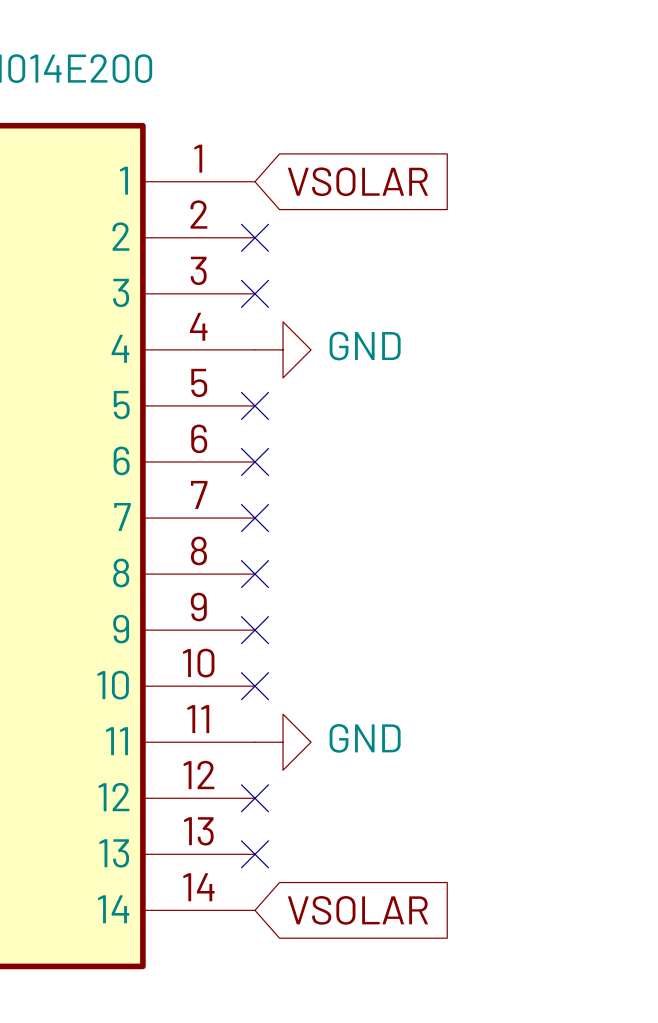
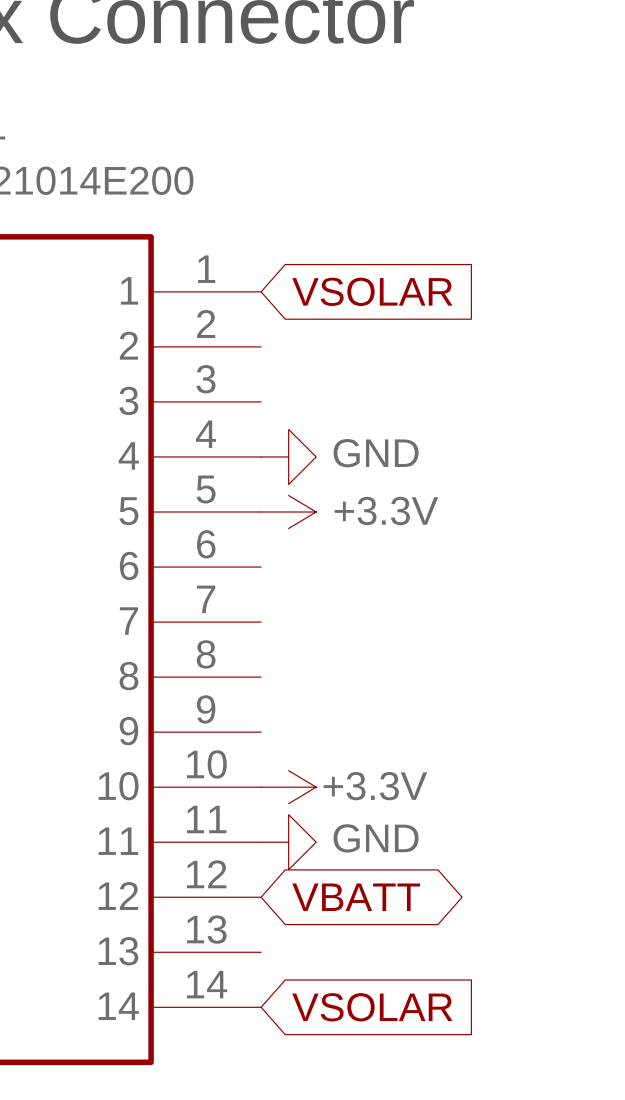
no-connect mark: (254, 237) -> none
no-connect mark: (254, 293) -> none
no-connect mark: (254, 405) -> none
power symbol: none -> +3.3V (288, 512)
no-connect mark: (254, 461) -> none
no-connect mark: (254, 518) -> none
no-connect mark: (254, 574) -> none
no-connect mark: (254, 630) -> none
no-connect mark: (254, 686) -> none
power symbol: none -> +3.3V (288, 787)
no-connect mark: (254, 798) -> none
global label: none -> VBATT (356, 897)
no-connect mark: (254, 854) -> none

